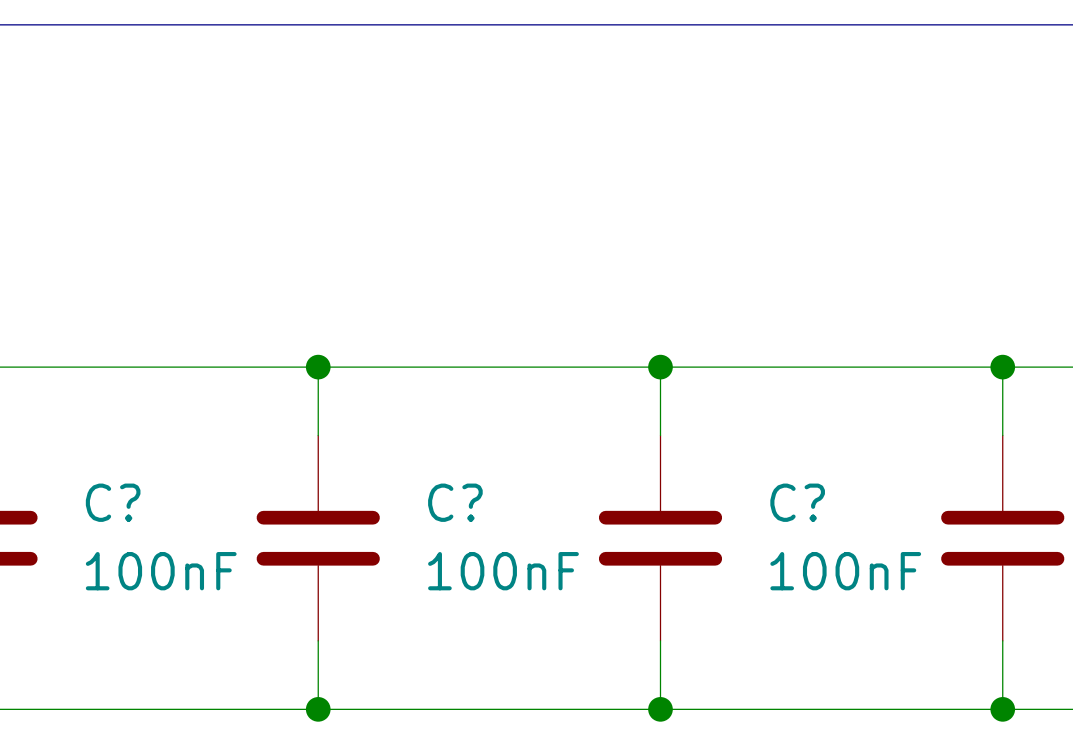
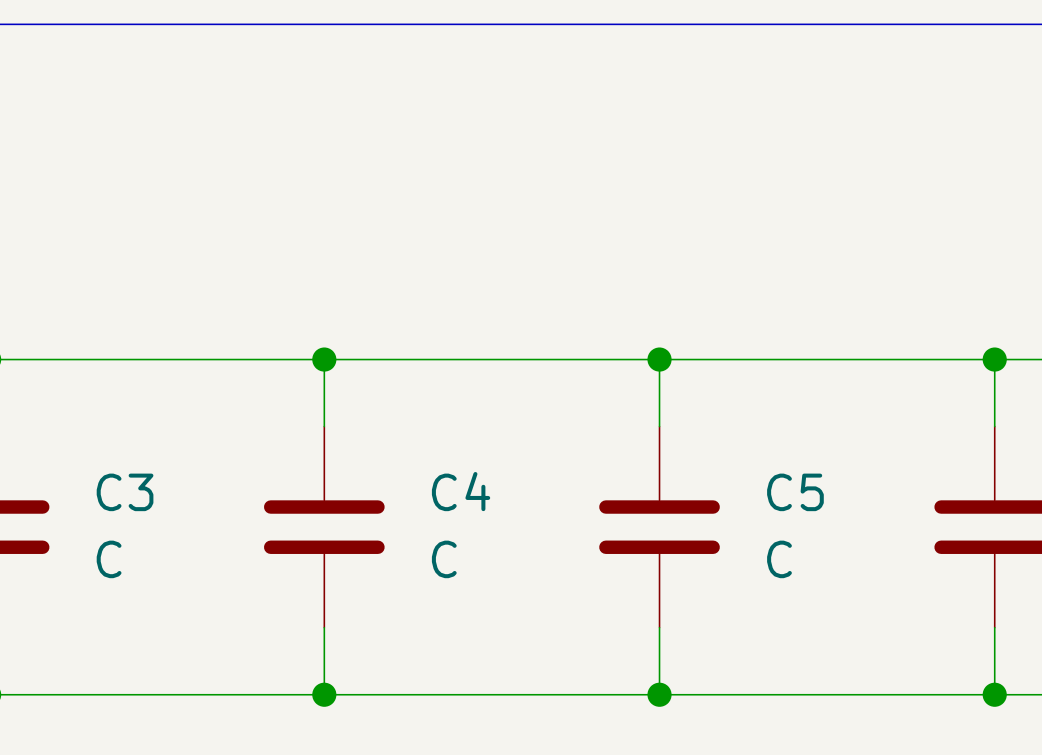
C? name: C? (113, 502) -> C3 (125, 492)
C? name: C? (455, 502) -> C4 (461, 491)
C? name: C? (797, 502) -> C5 (795, 492)
C? value: 100nF (161, 571) -> C (109, 559)
C? value: 100nF (503, 571) -> C (444, 559)
C? value: 100nF (845, 571) -> C (779, 559)

